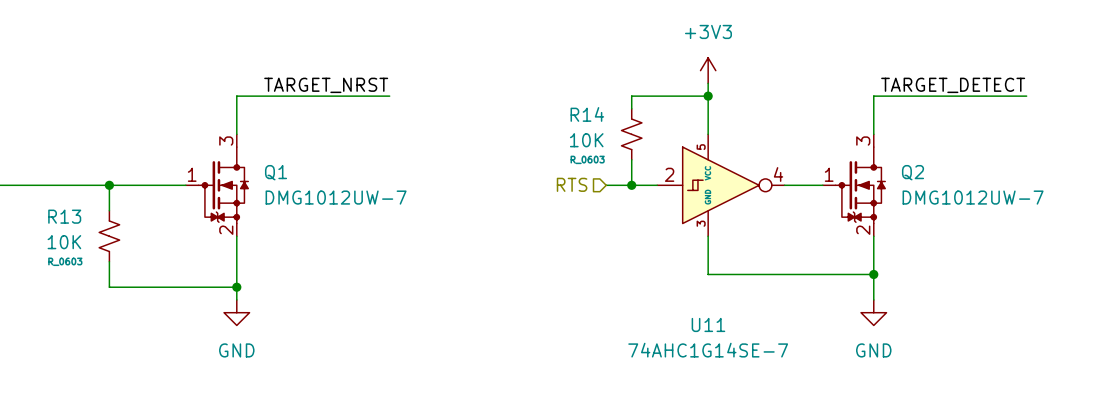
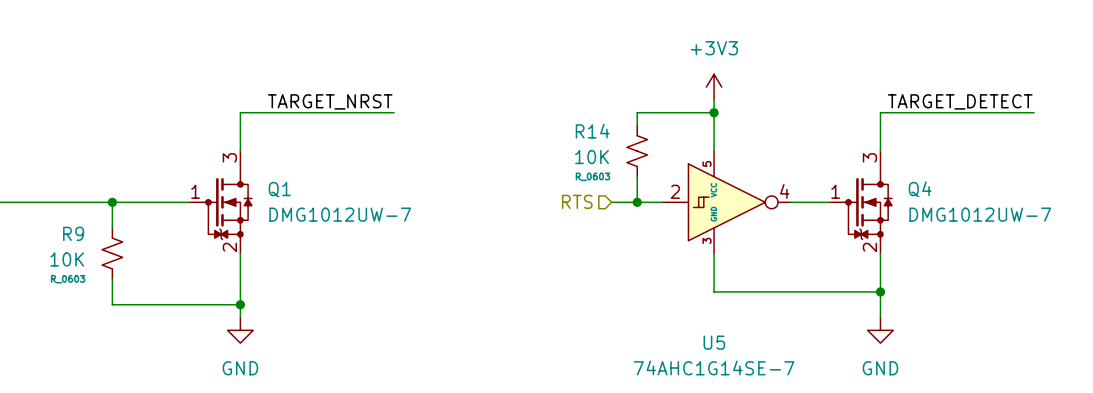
Q2 name: Q2 (913, 172) -> Q4 (920, 189)
R13 name: R13 (64, 216) -> R9 (73, 233)
U11 name: U11 (708, 324) -> U5 (714, 342)

